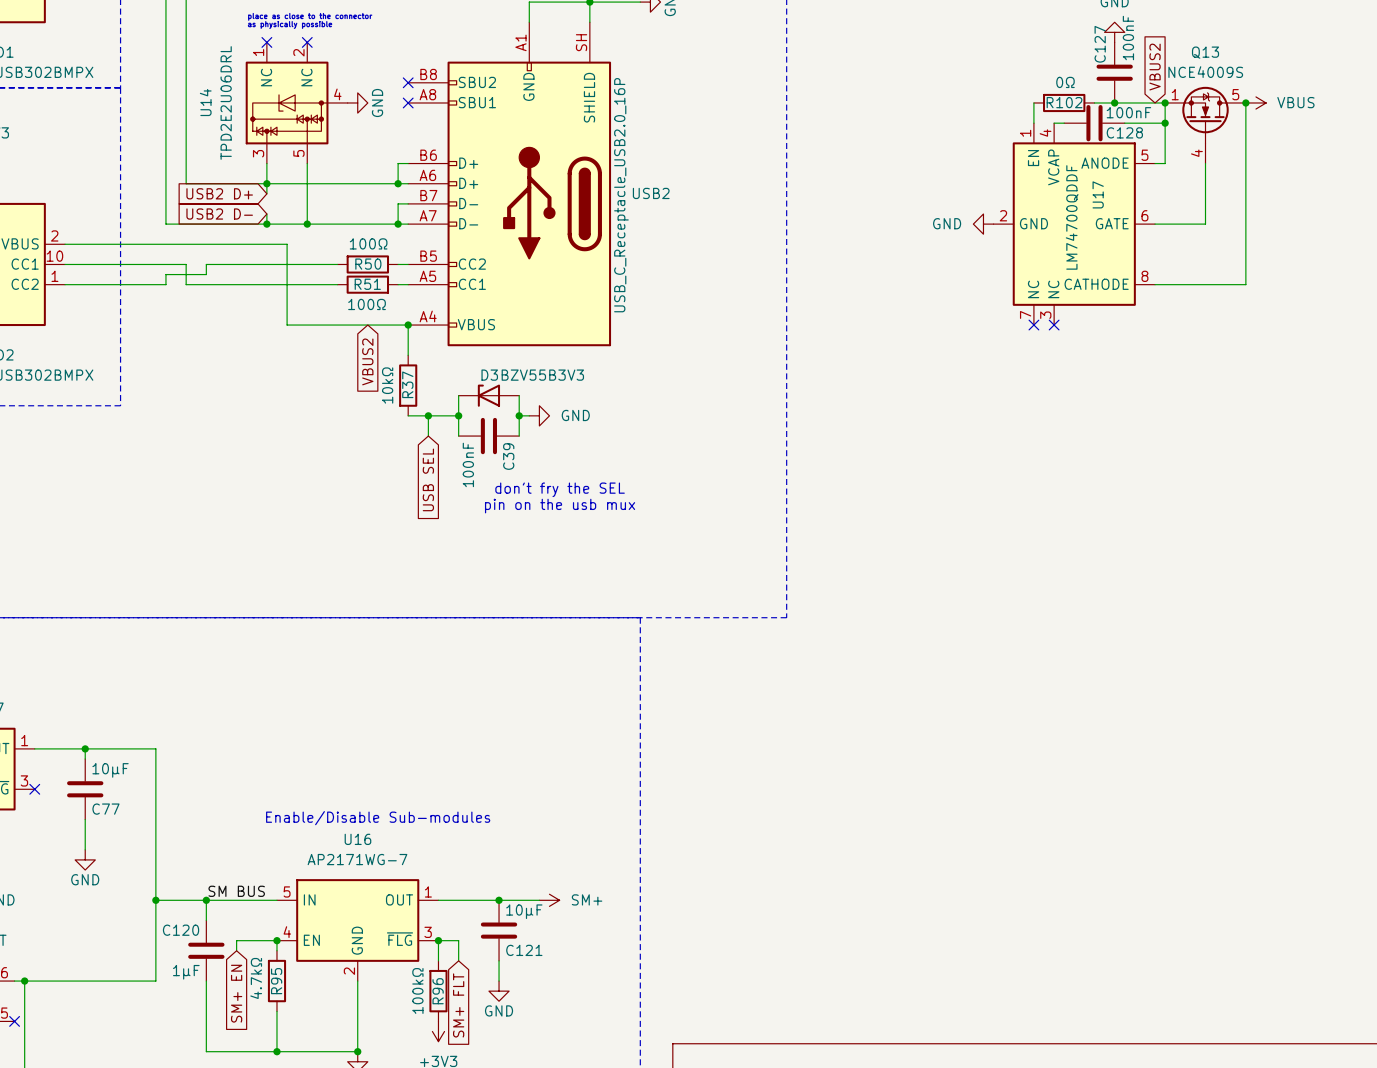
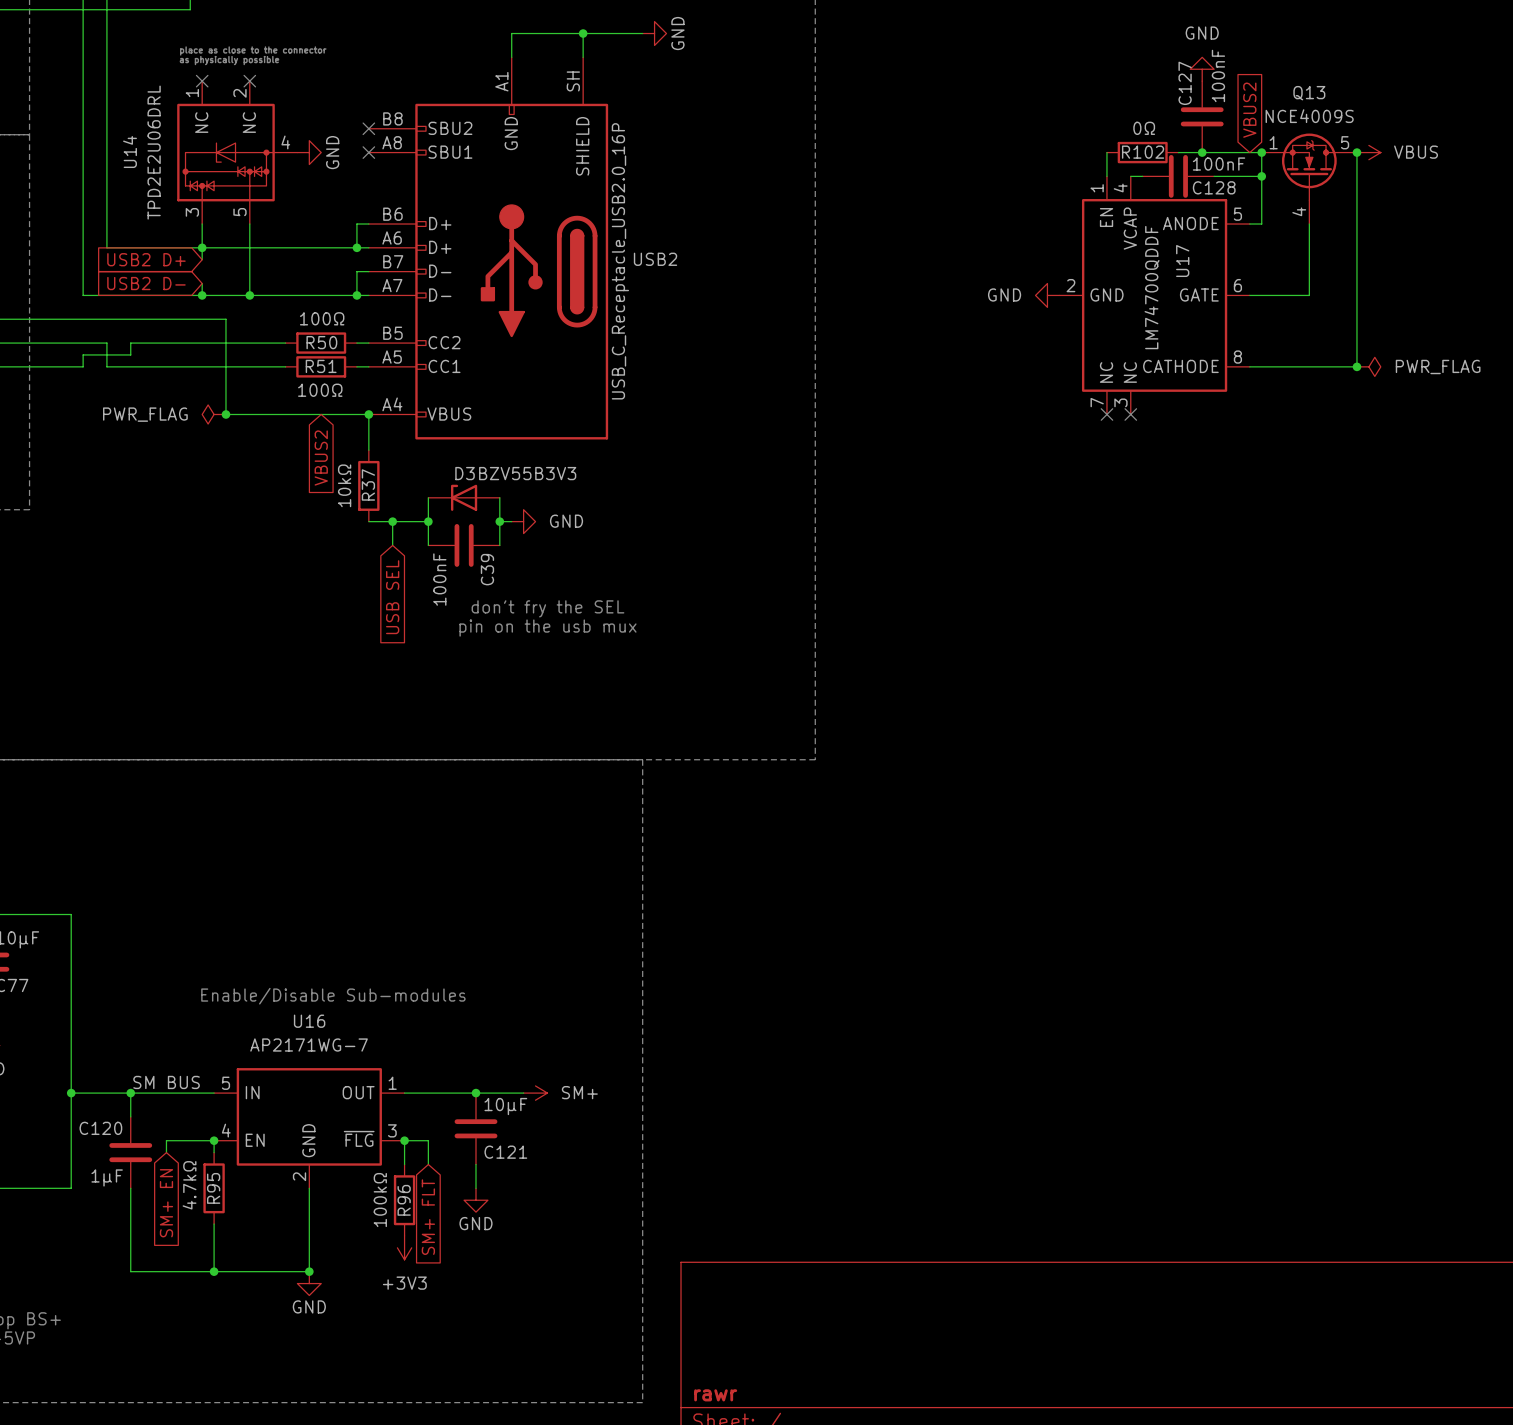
junction: none -> (1356, 366)
power symbol: none -> PWR_FLAG (1368, 366)
power symbol: none -> PWR_FLAG (214, 414)
junction: none -> (225, 414)

